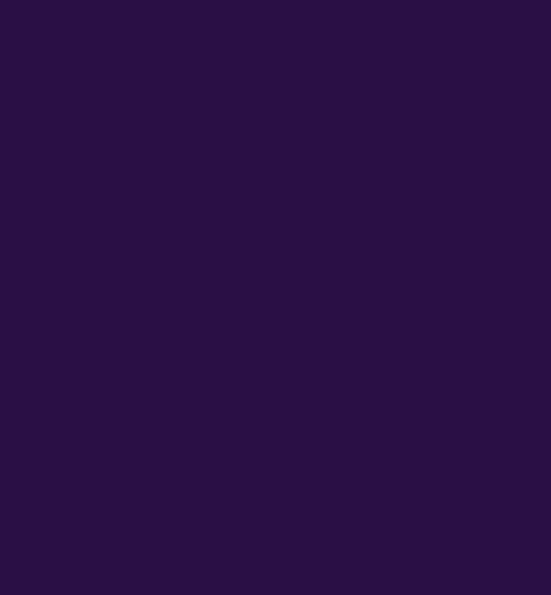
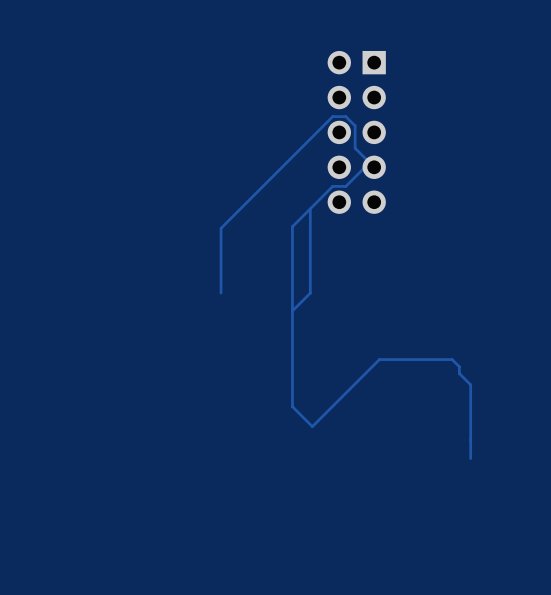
part: none -> (356, 132)
track: none -> (310, 208) (310, 293) (292, 310)
track: none -> (221, 293) (221, 228) (332, 116) (345, 116) (355, 125) (355, 148) (374, 167) (364, 167) (345, 186) (332, 186) (292, 226) (292, 406) (312, 426) (379, 359) (452, 359) (459, 366) (459, 373) (470, 384) (470, 458)

